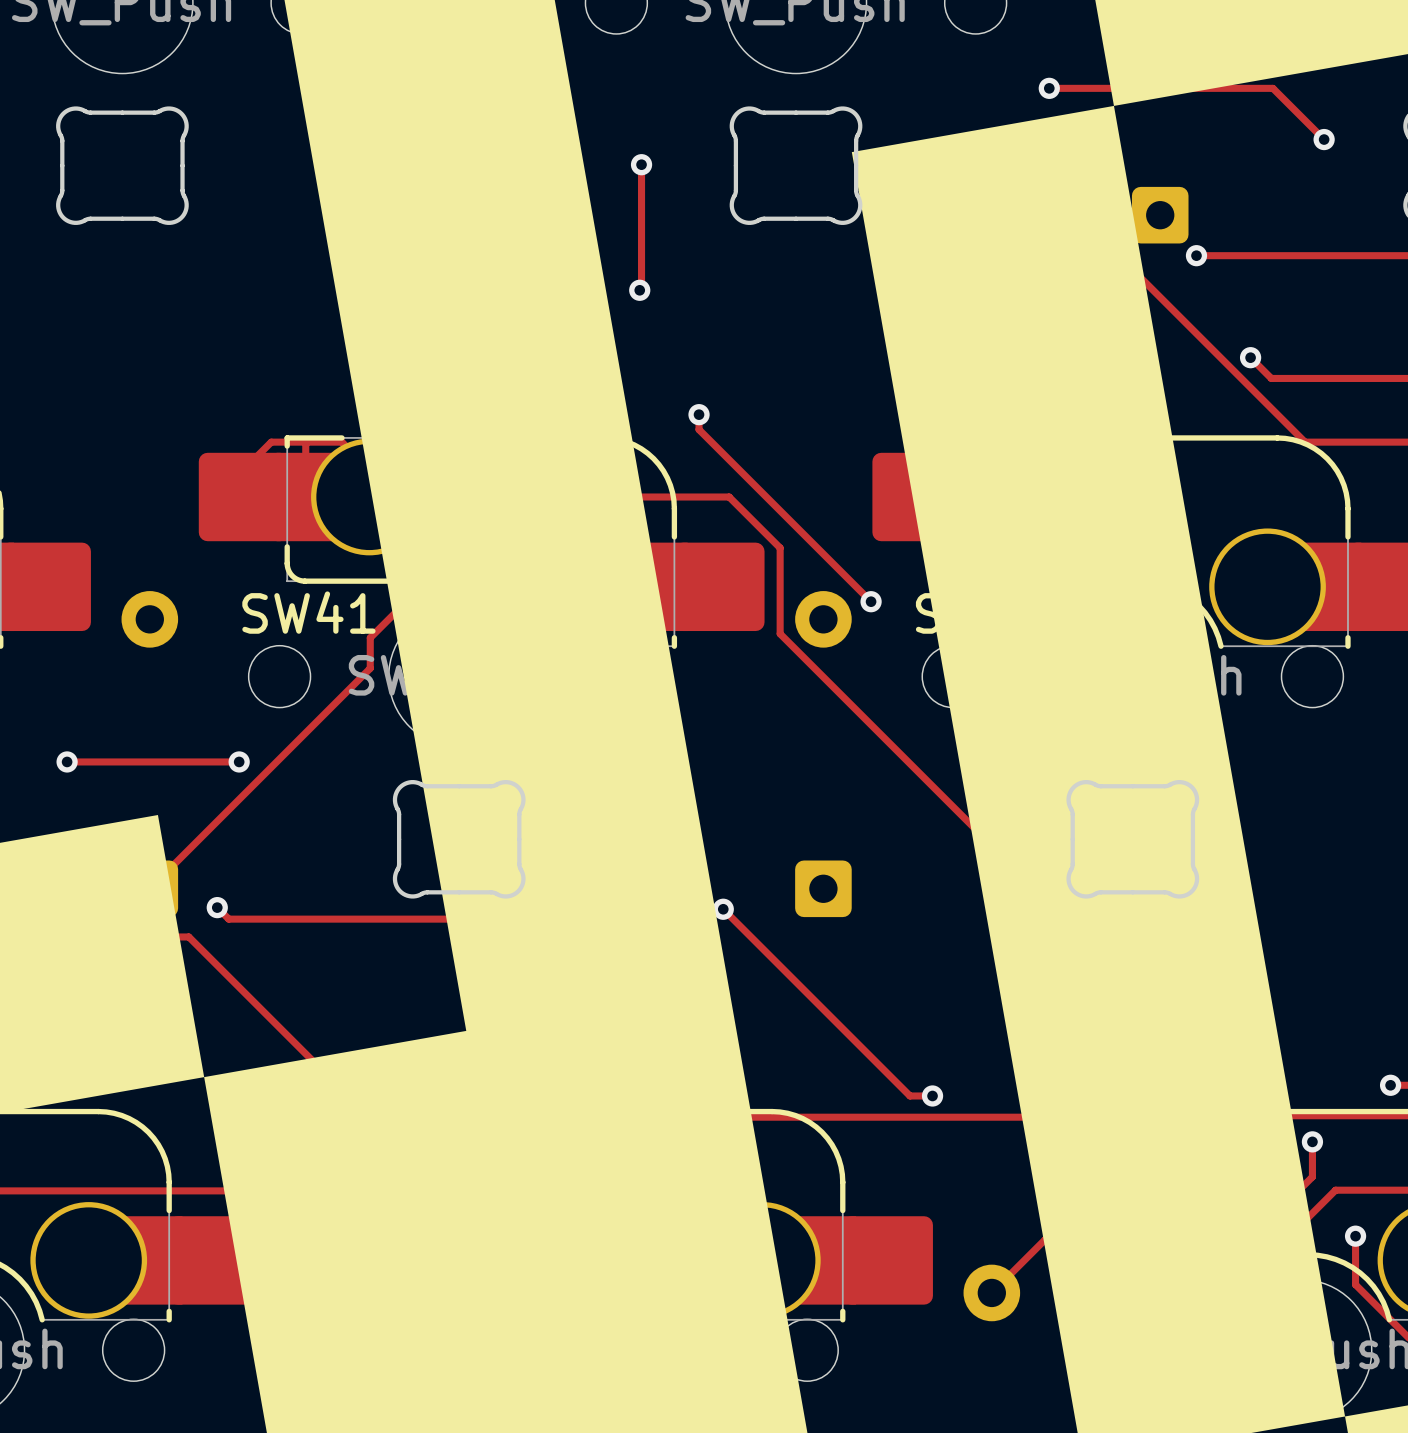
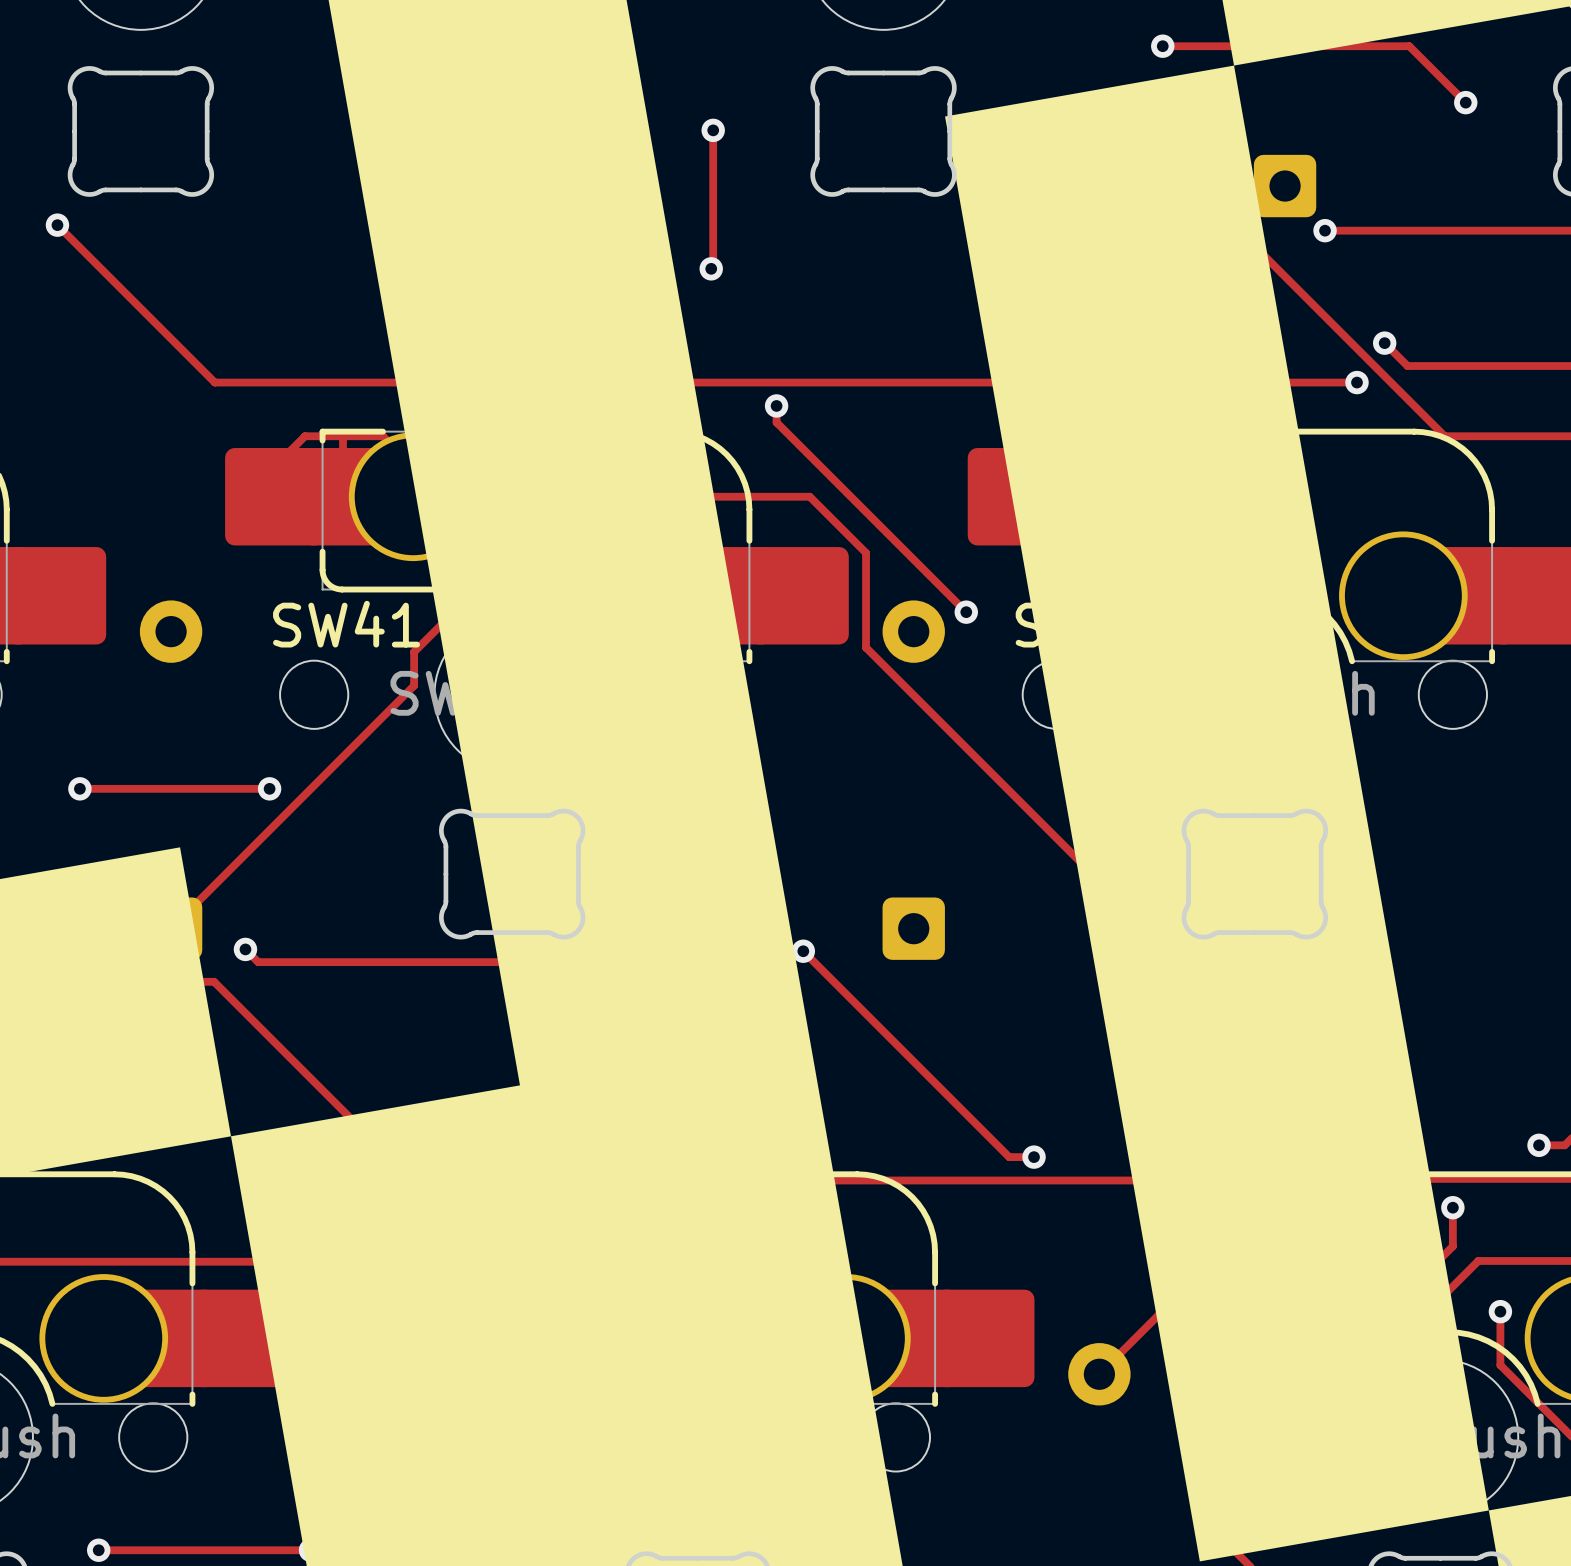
track: none -> (57, 225) (214, 382) (1357, 382)
via: none -> (57, 225)
via: none -> (1357, 382)

